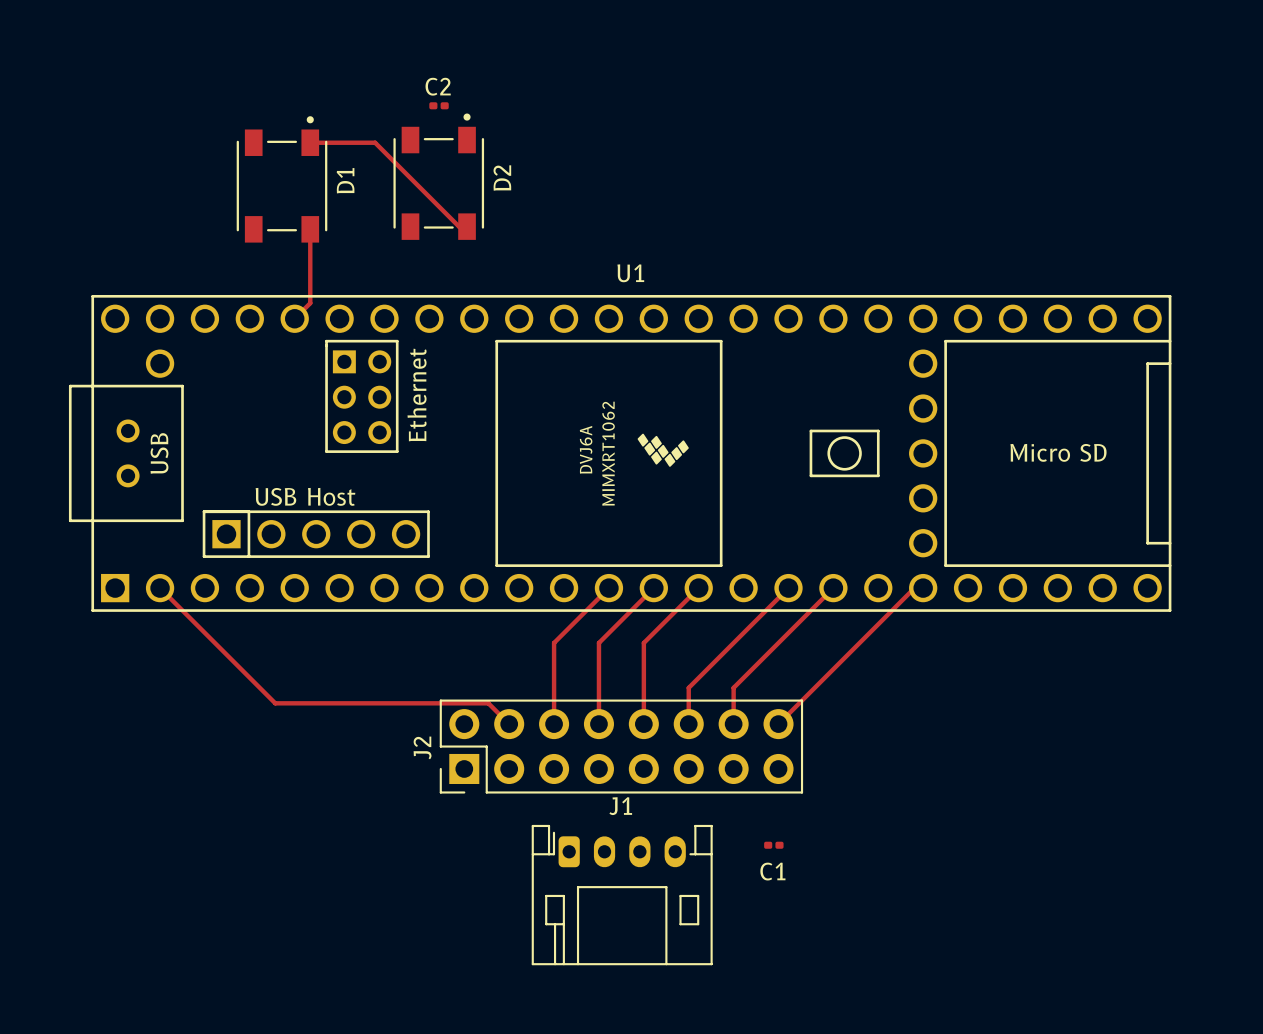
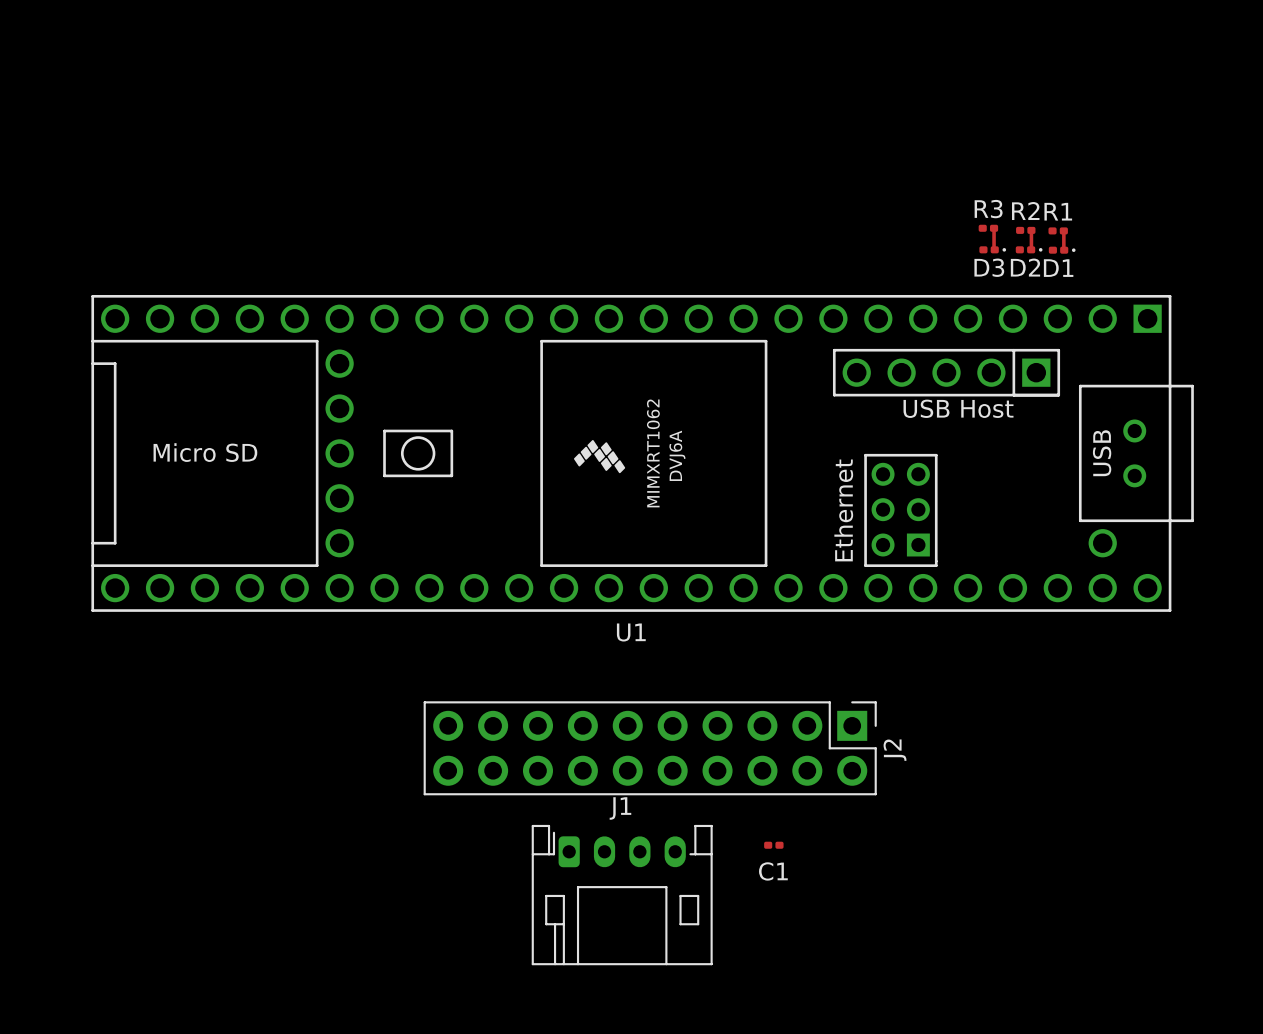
C2: (439, 105) -> none
D2 footprint: [393, 113, 485, 240] -> [1015, 246, 1043, 254]
D1 footprint: [236, 116, 328, 243] -> [1048, 246, 1076, 254]
track: (310, 142) (375, 142) (459, 226) (467, 226) -> none
D2 name position: D2 (502, 178) -> D2 (1025, 267)
D1 name position: D1 (345, 180) -> D1 (1058, 268)
R3: none -> (988, 228)
track: none -> (994, 228) (994, 249)
track: (310, 229) (310, 303) (294, 318) -> none
R2: none -> (1025, 230)
track: none -> (1031, 230) (1031, 249)
R1: none -> (1058, 230)
track: none -> (1063, 230) (1064, 250)
D3: none -> (992, 249)
U1 rotation: 0° (620, 453) -> 180° (642, 453)
track: (160, 588) (275, 703) (488, 703) (509, 724) -> none
track: (608, 588) (554, 642) (554, 724) -> none
track: (653, 588) (598, 642) (598, 724) -> none
track: (698, 588) (643, 642) (643, 724) -> none
track: (788, 588) (688, 687) (688, 724) -> none
track: (833, 588) (733, 687) (733, 724) -> none
track: (923, 588) (914, 588) (778, 724) -> none
J2 footprint: [439, 699, 804, 794] -> [423, 701, 877, 796]
J2 name position: J2 (422, 747) -> J2 (895, 750)

